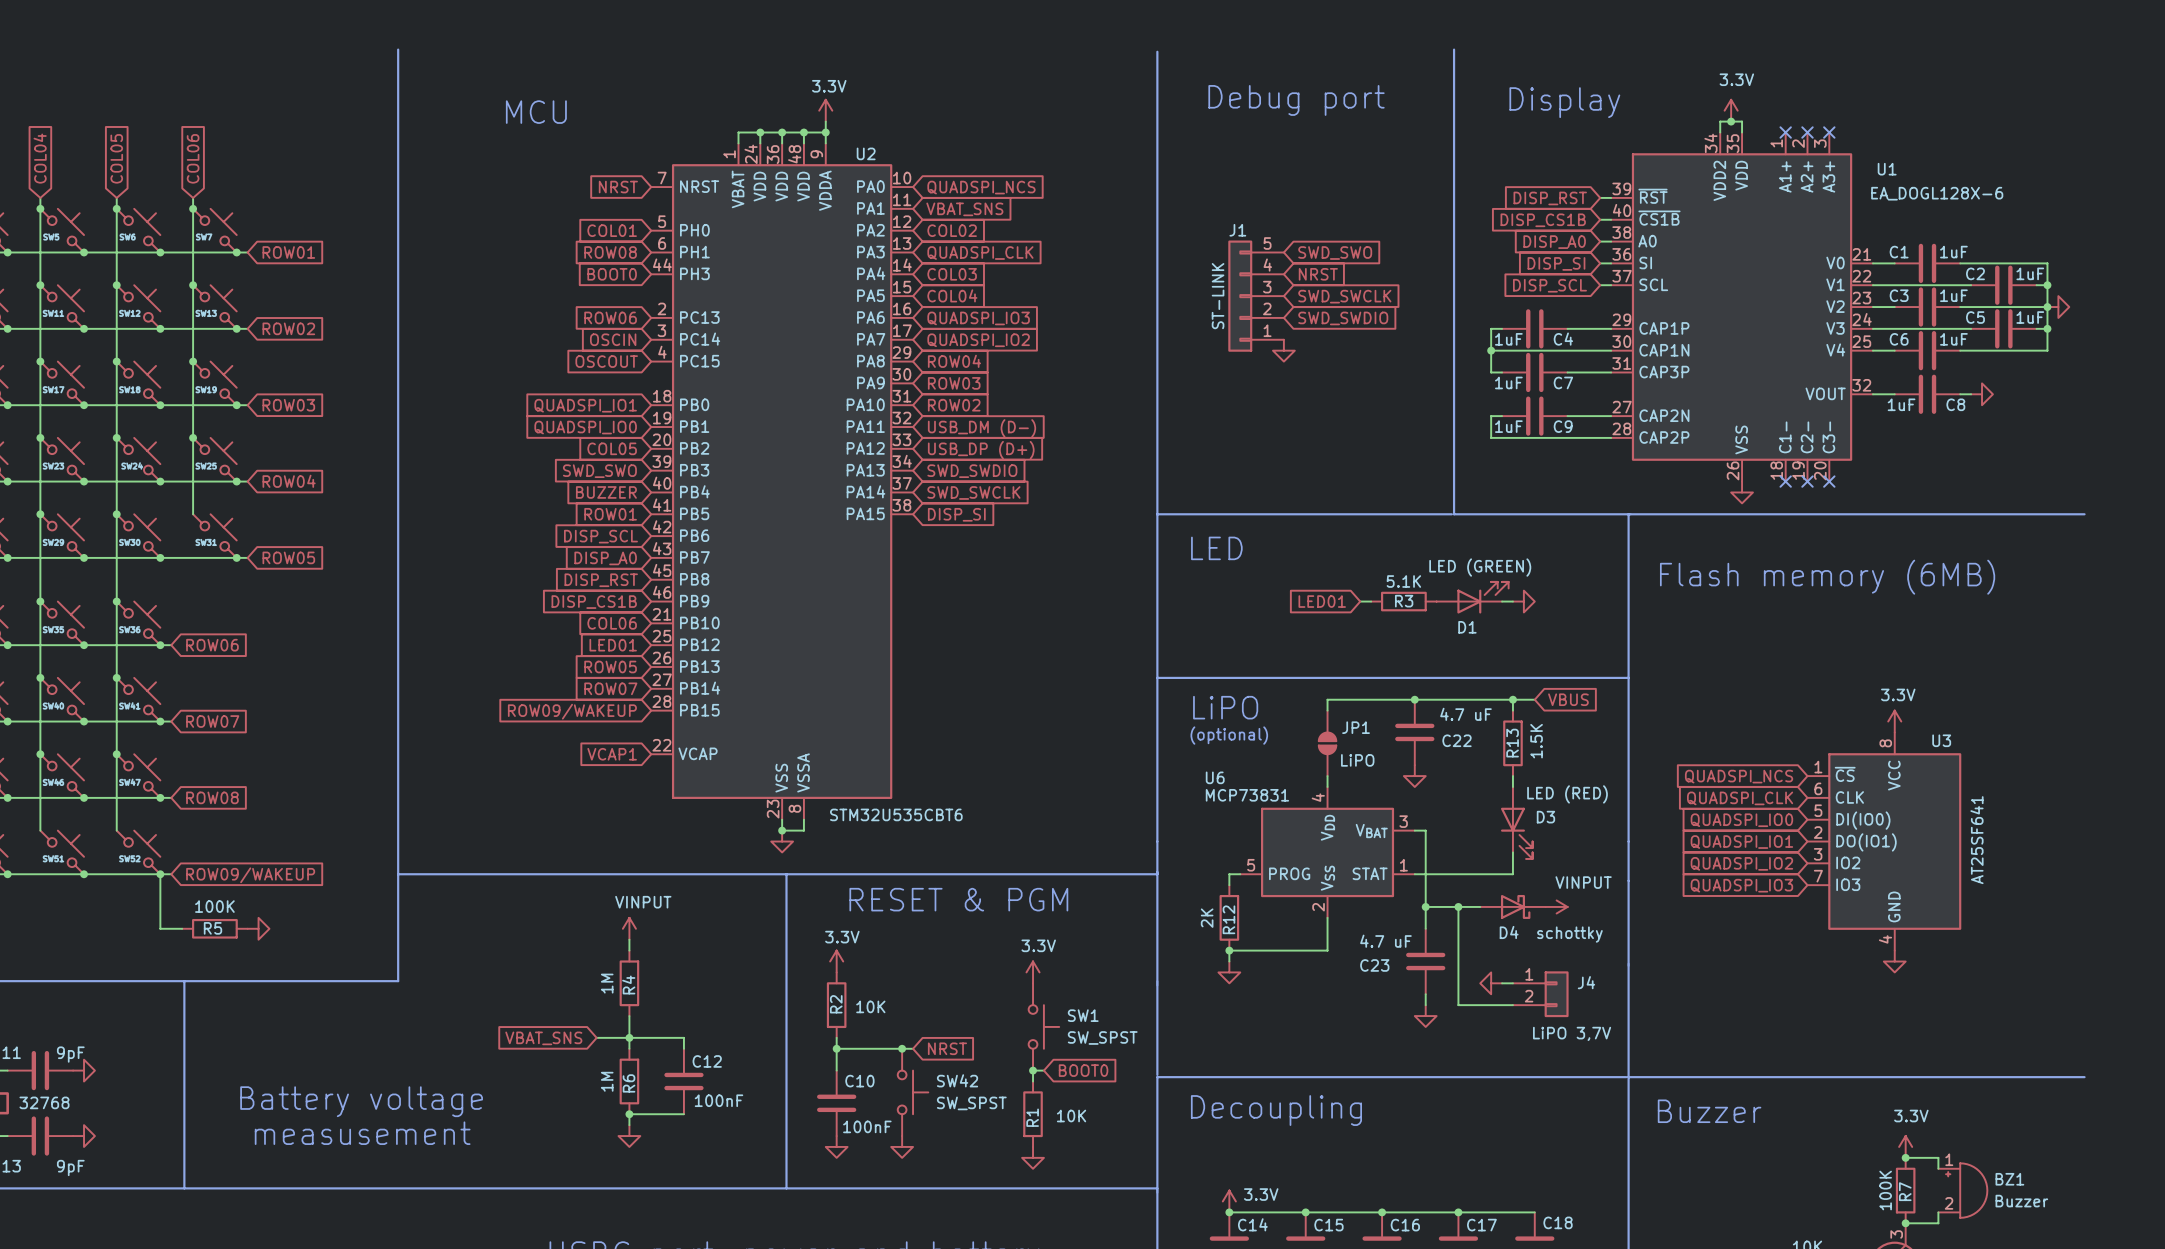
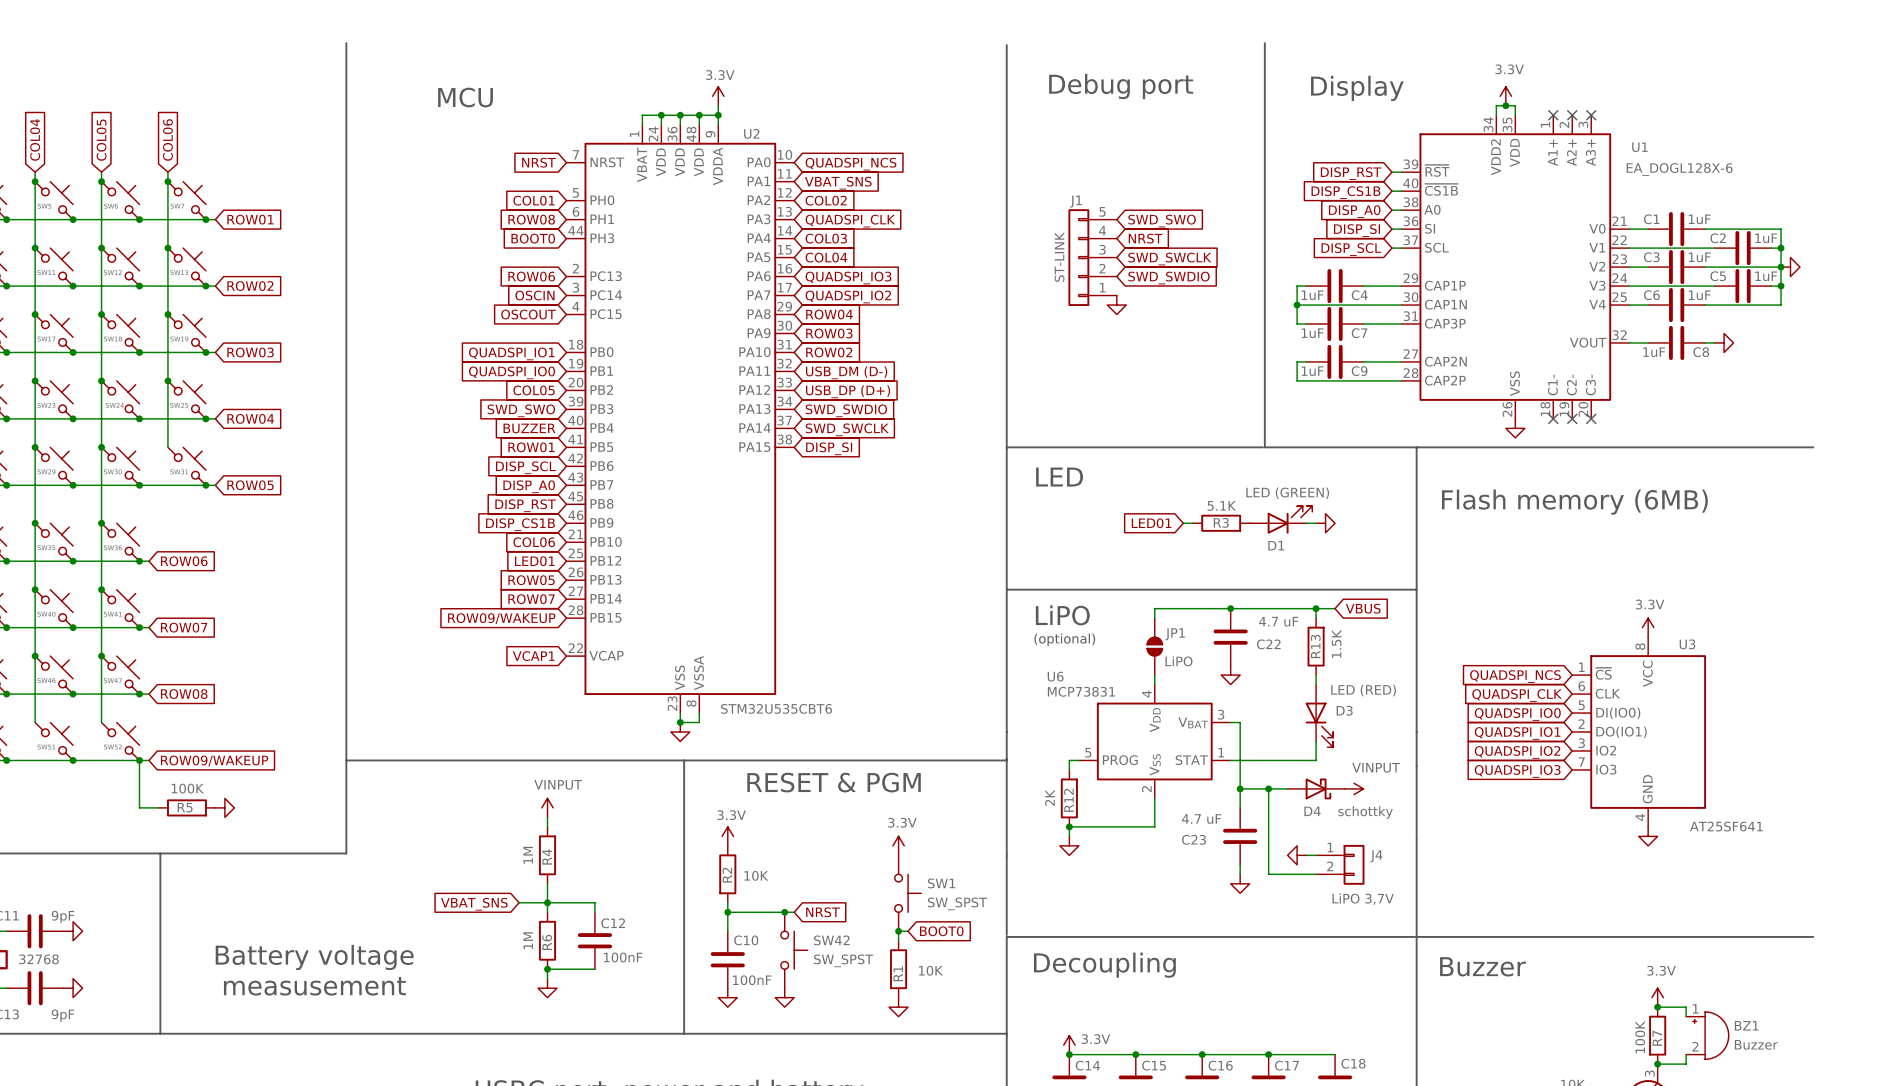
U3 value rotation: 0° (1976, 840) -> 90° clockwise (1726, 826)
U3 value position: AT25SF641 (1976, 840) -> AT25SF641 (1726, 826)

